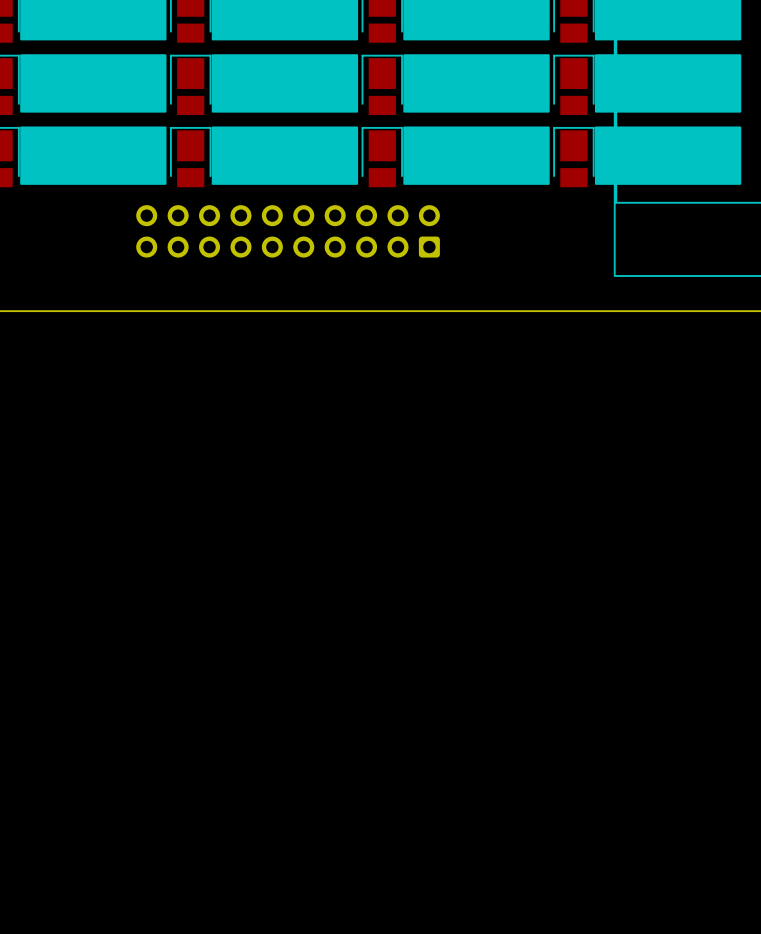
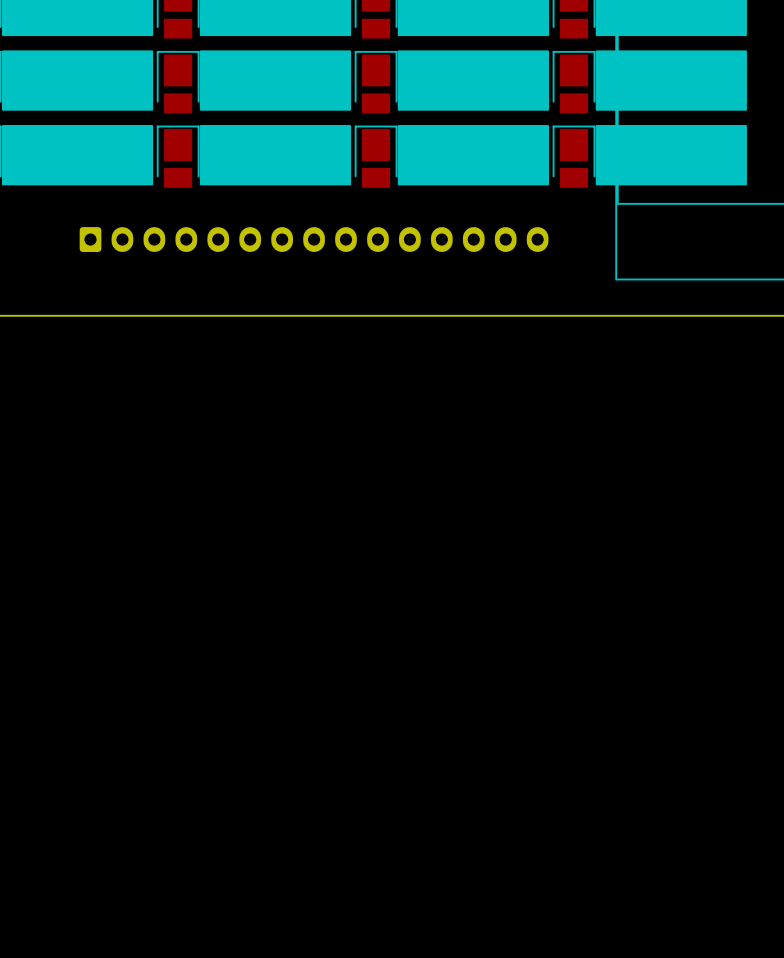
part: (288, 231) -> none
part: none -> (314, 239)

